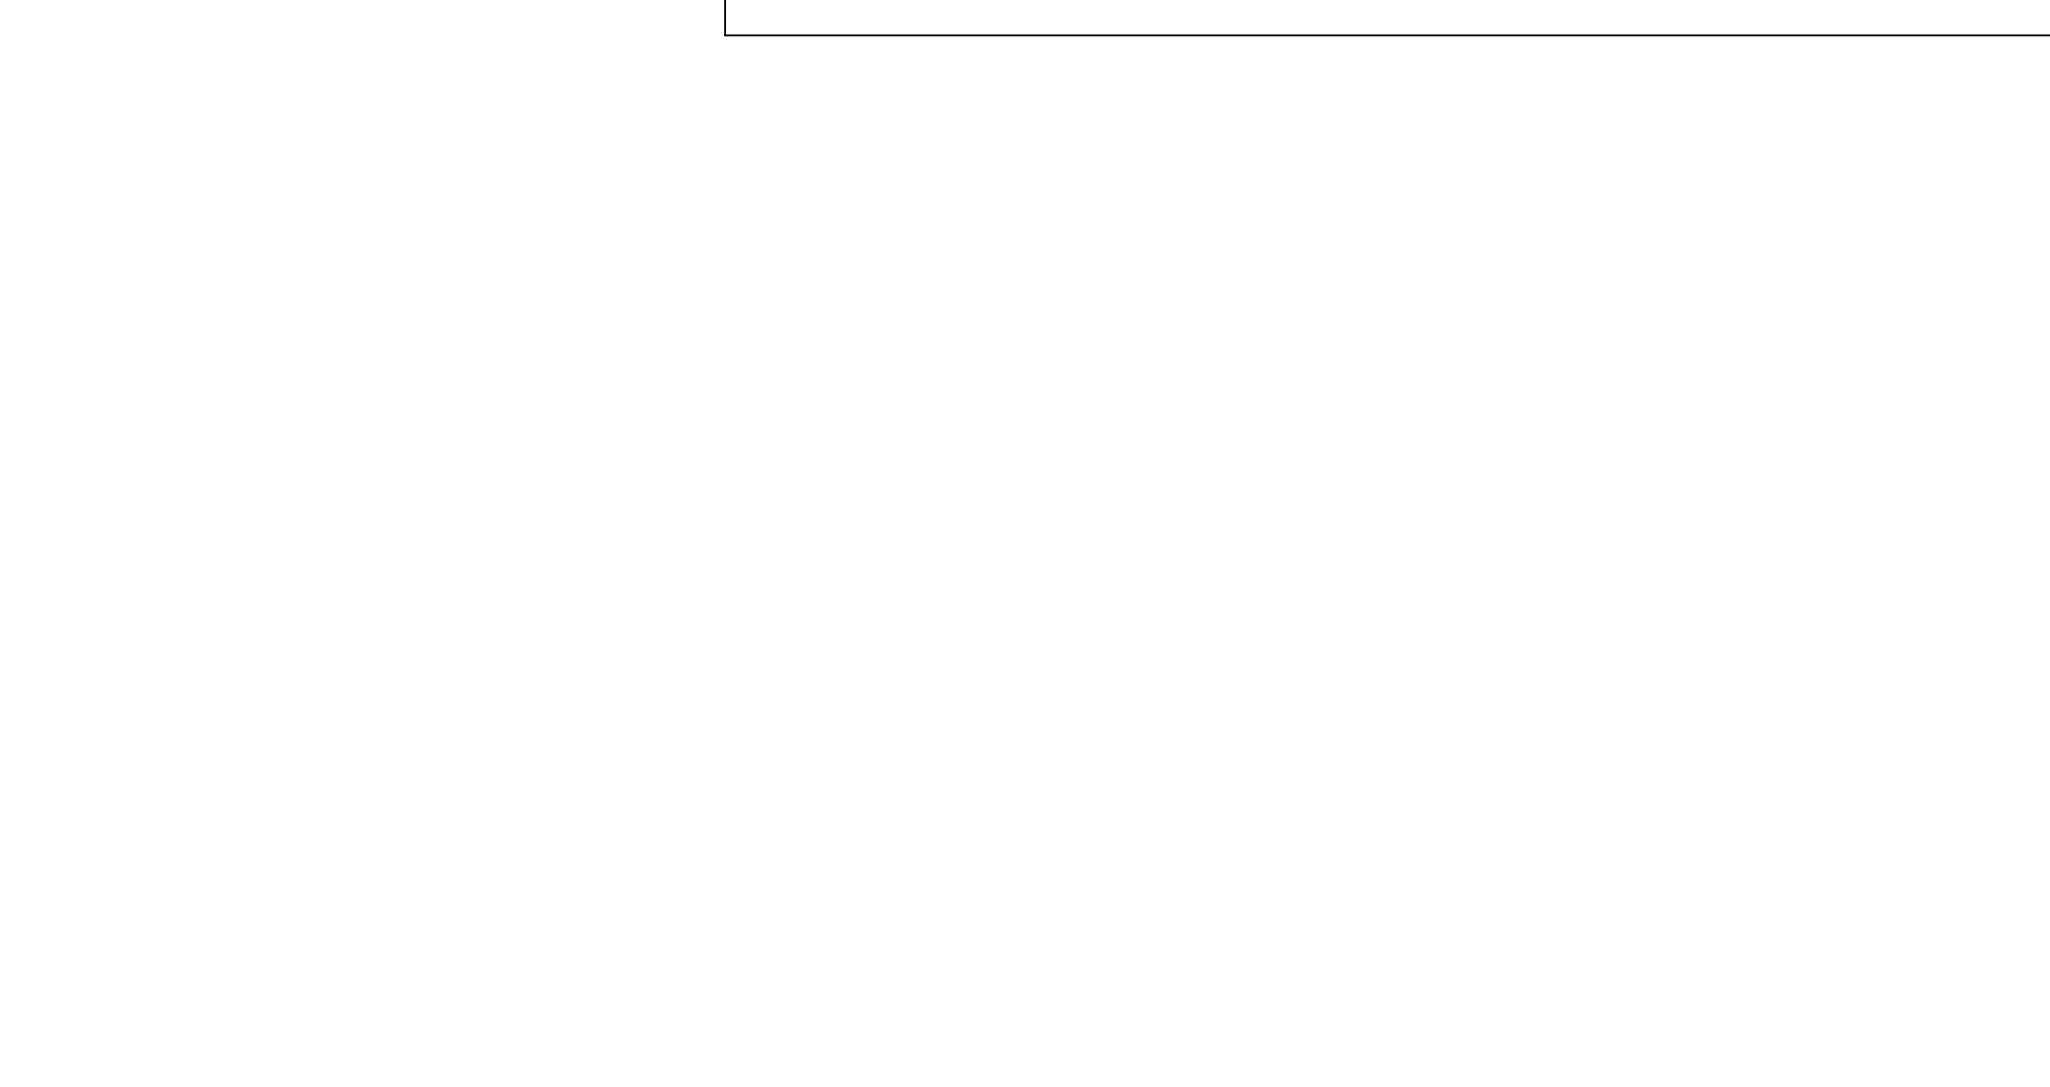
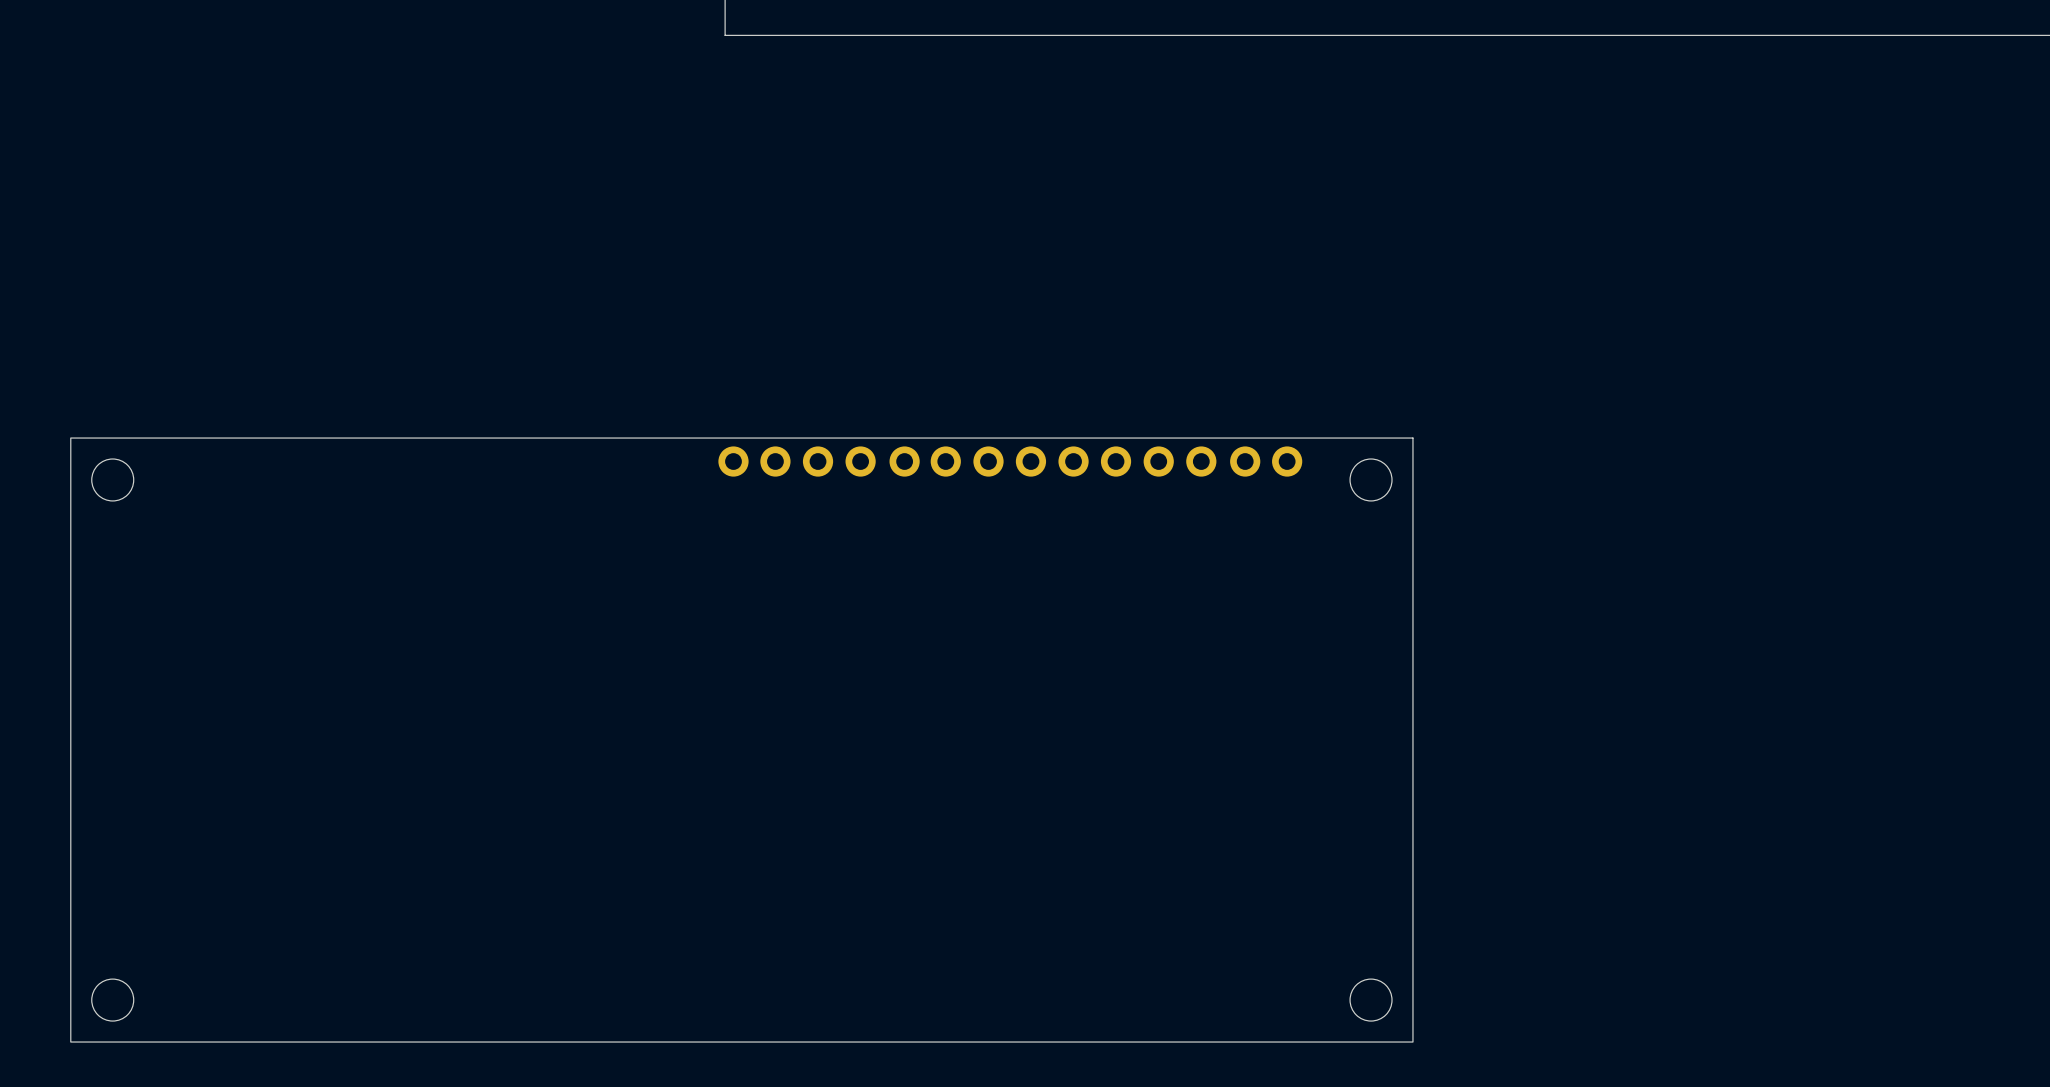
part: none -> (741, 740)

